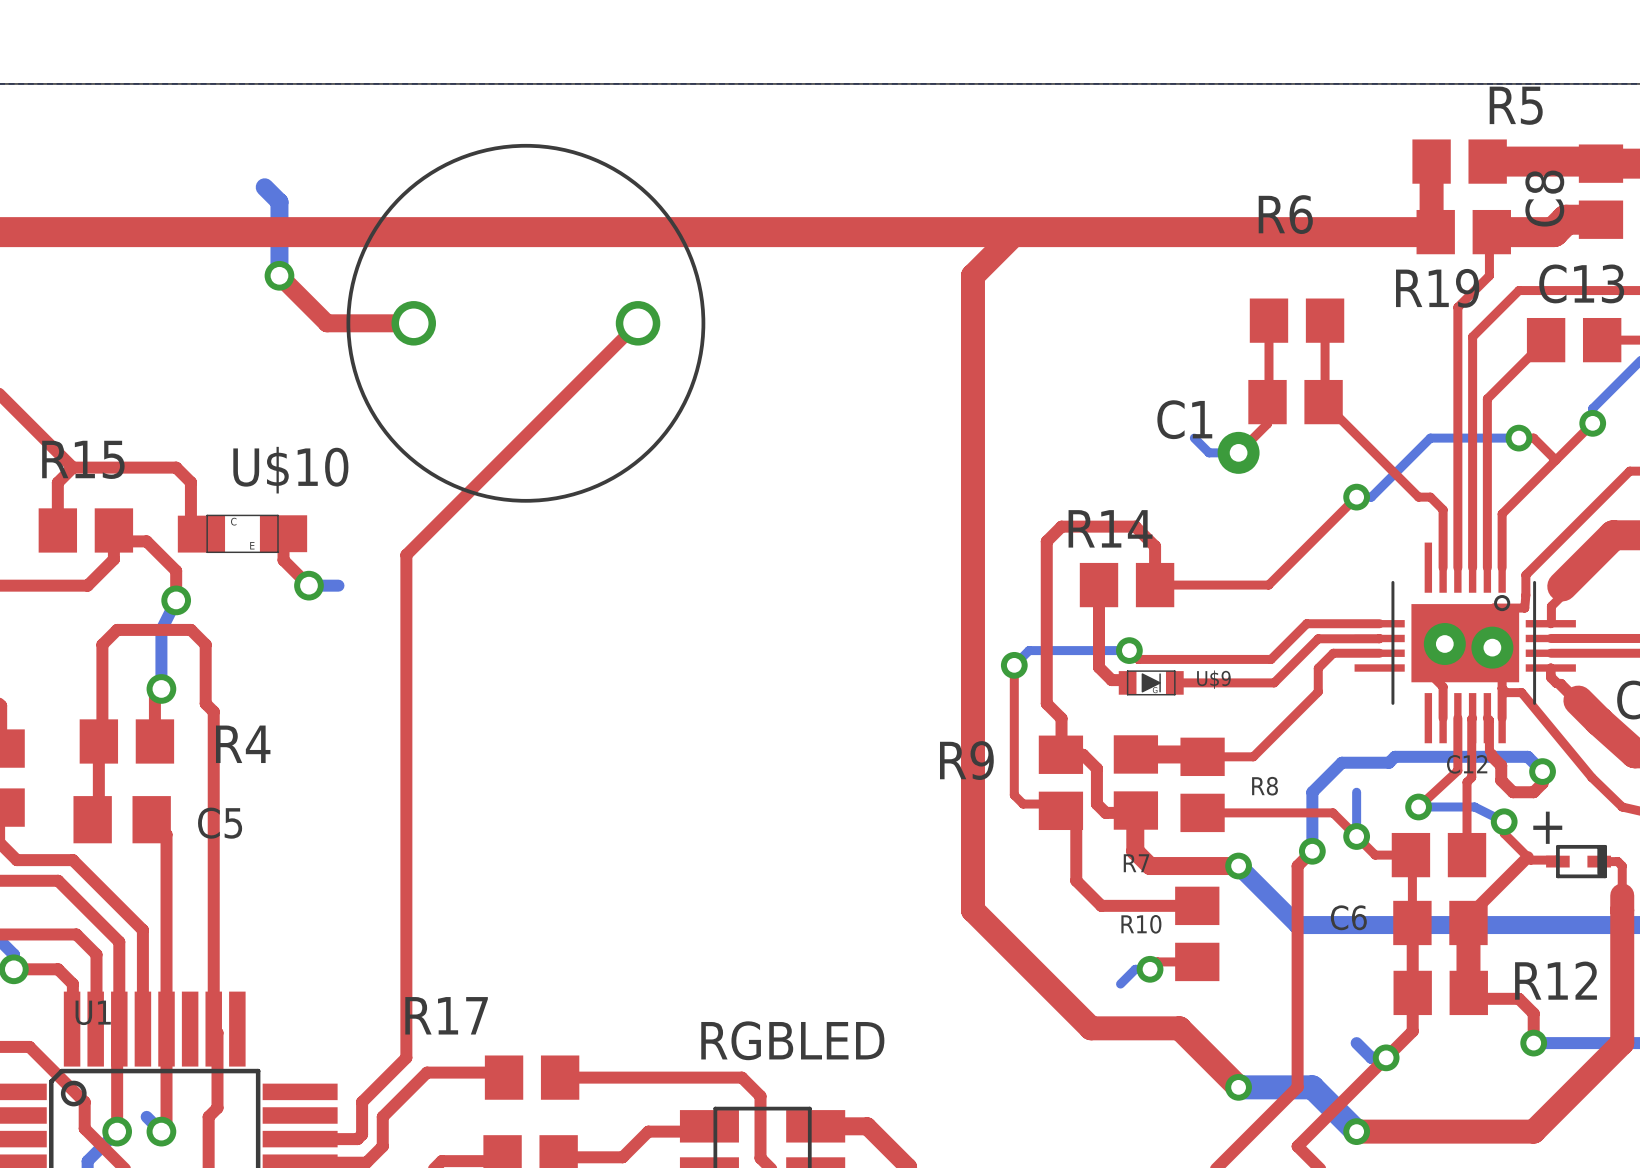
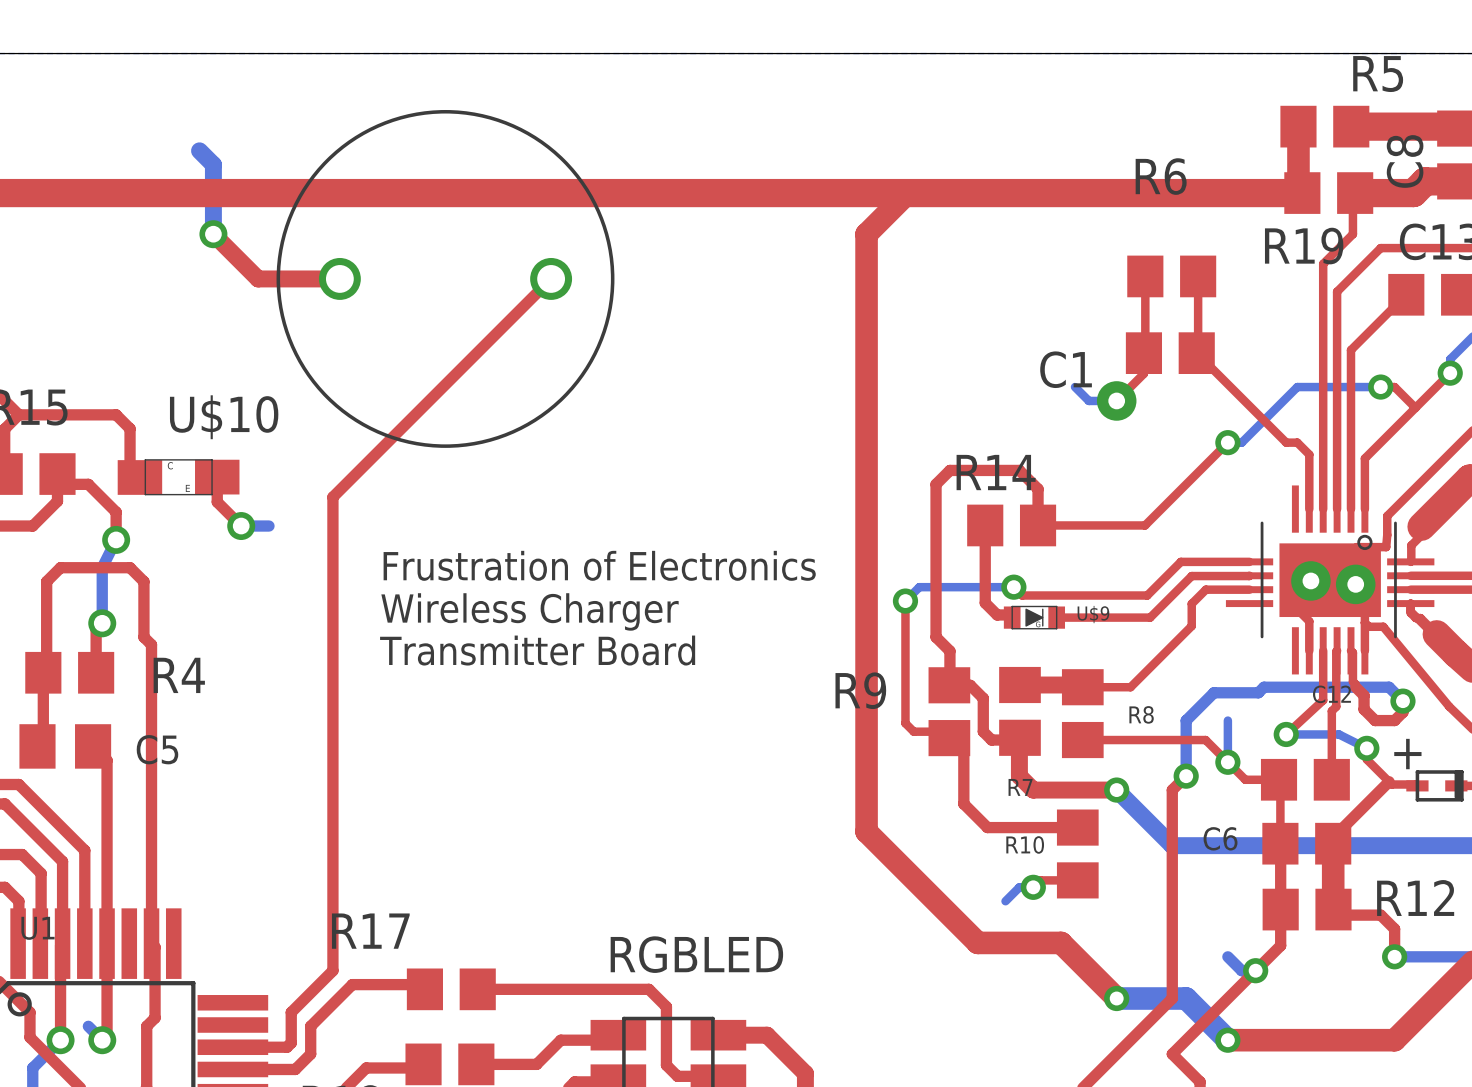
text: none -> Frustration of Electronics (599, 565)
text: none -> Wireless Charger (530, 611)
text: none -> Transmitter Board (537, 650)

